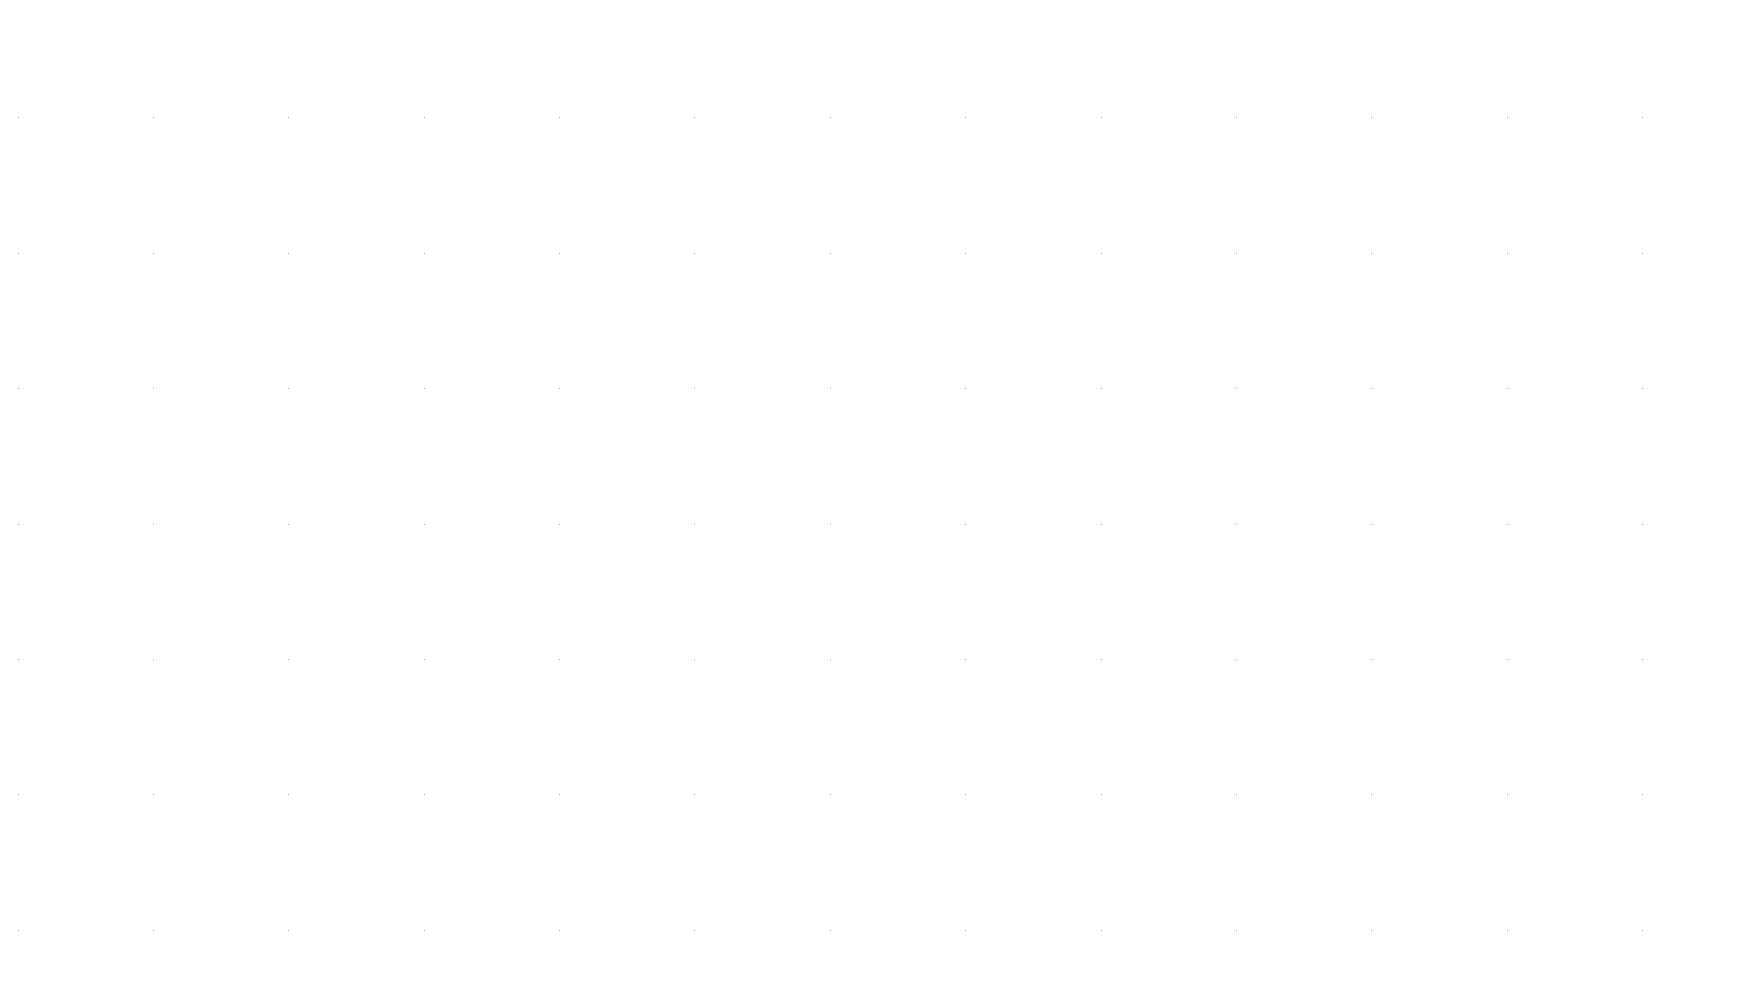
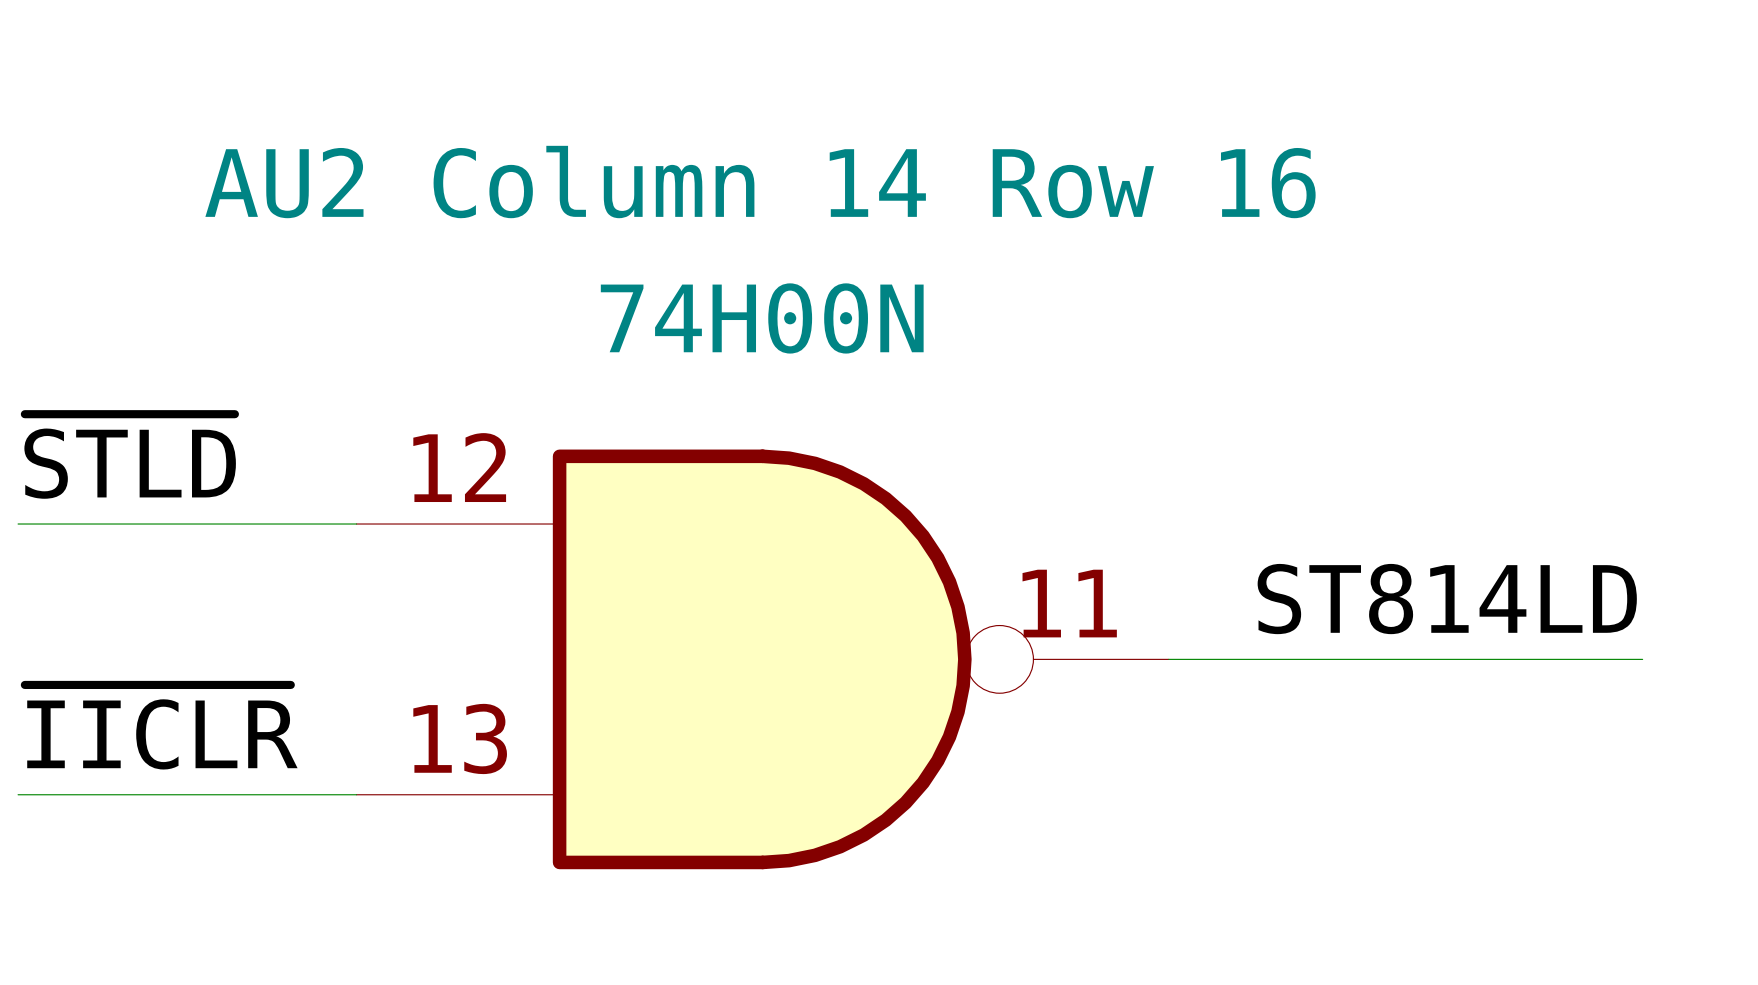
label: none -> ~{STLD} (130, 456)
wire: none -> (18, 524) (356, 524)
label: none -> ST814LD (1447, 599)
part: none -> 74H00N (762, 659)
wire: none -> (1168, 659) (1642, 659)
label: none -> ~{IICLR} (161, 727)
wire: none -> (18, 794) (356, 794)

